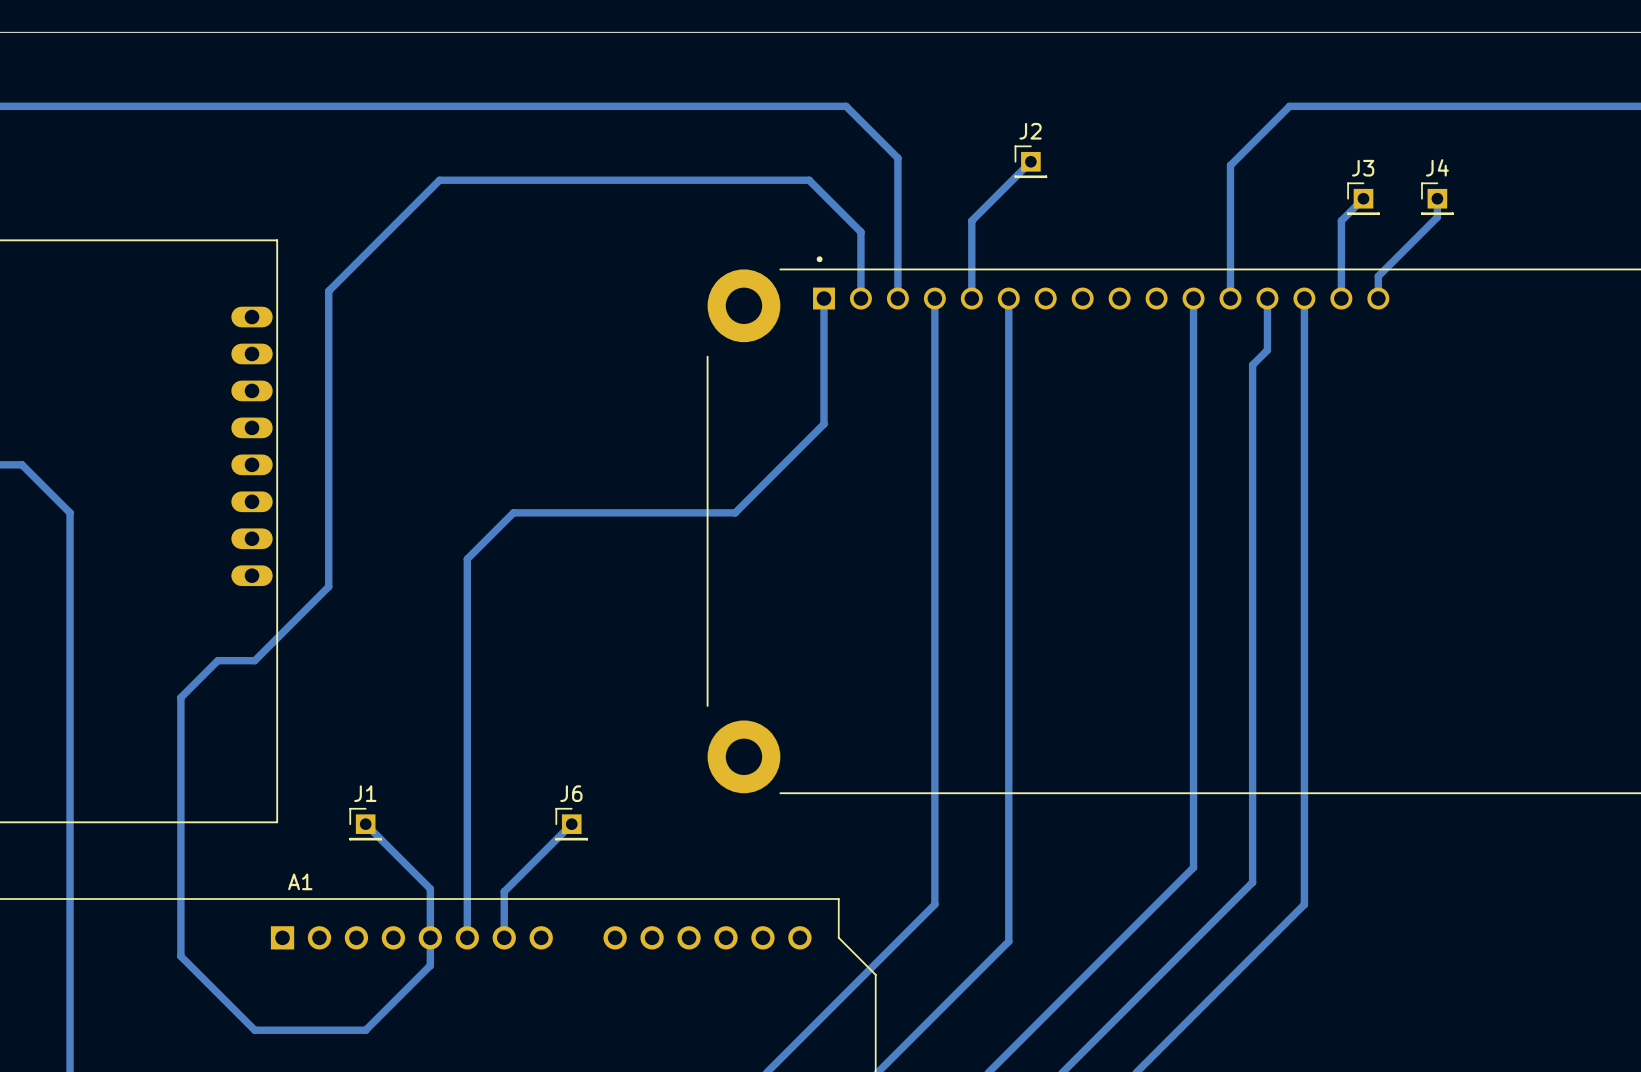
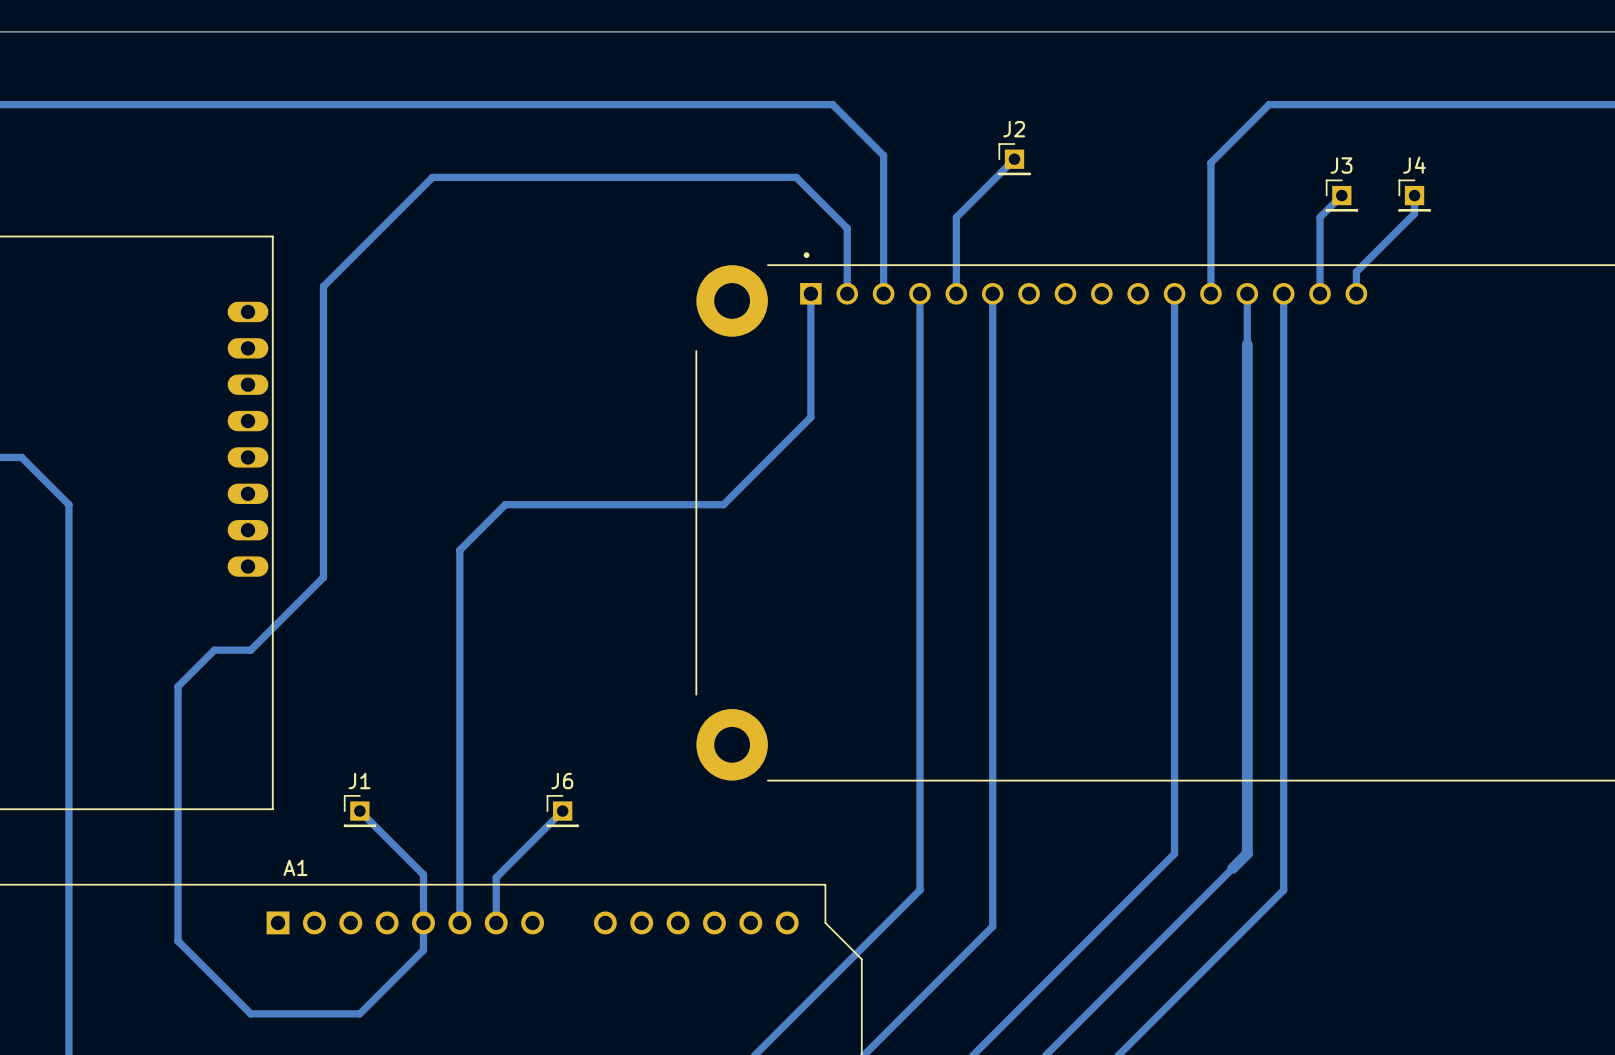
bottom track: (1267, 350) (1252, 365) (1252, 882) -> (1247, 344) (1247, 853) (1232, 868)

